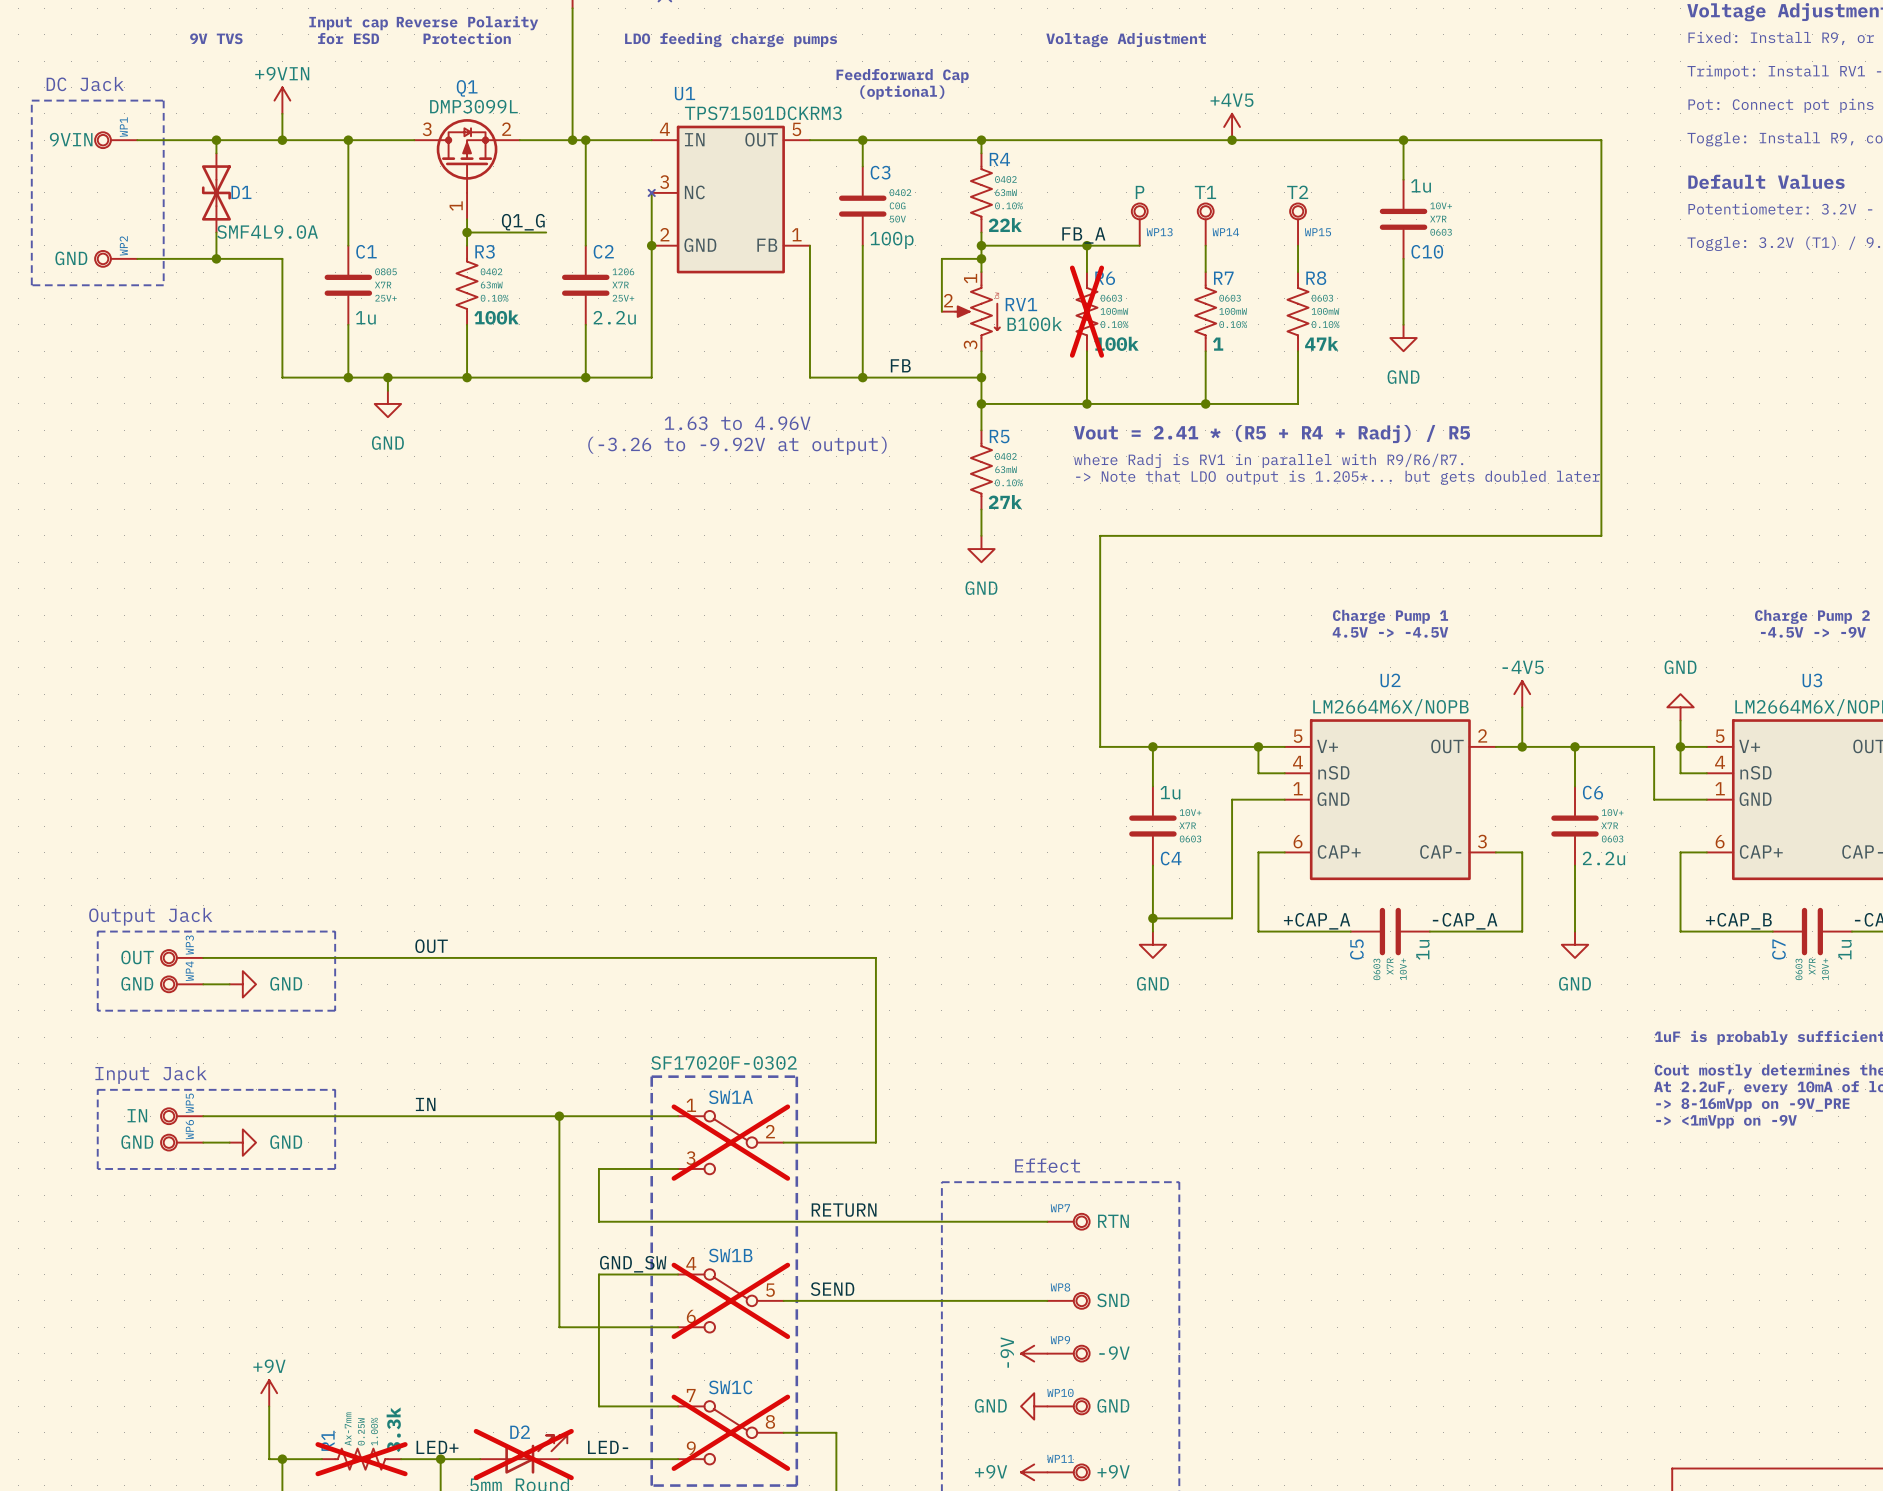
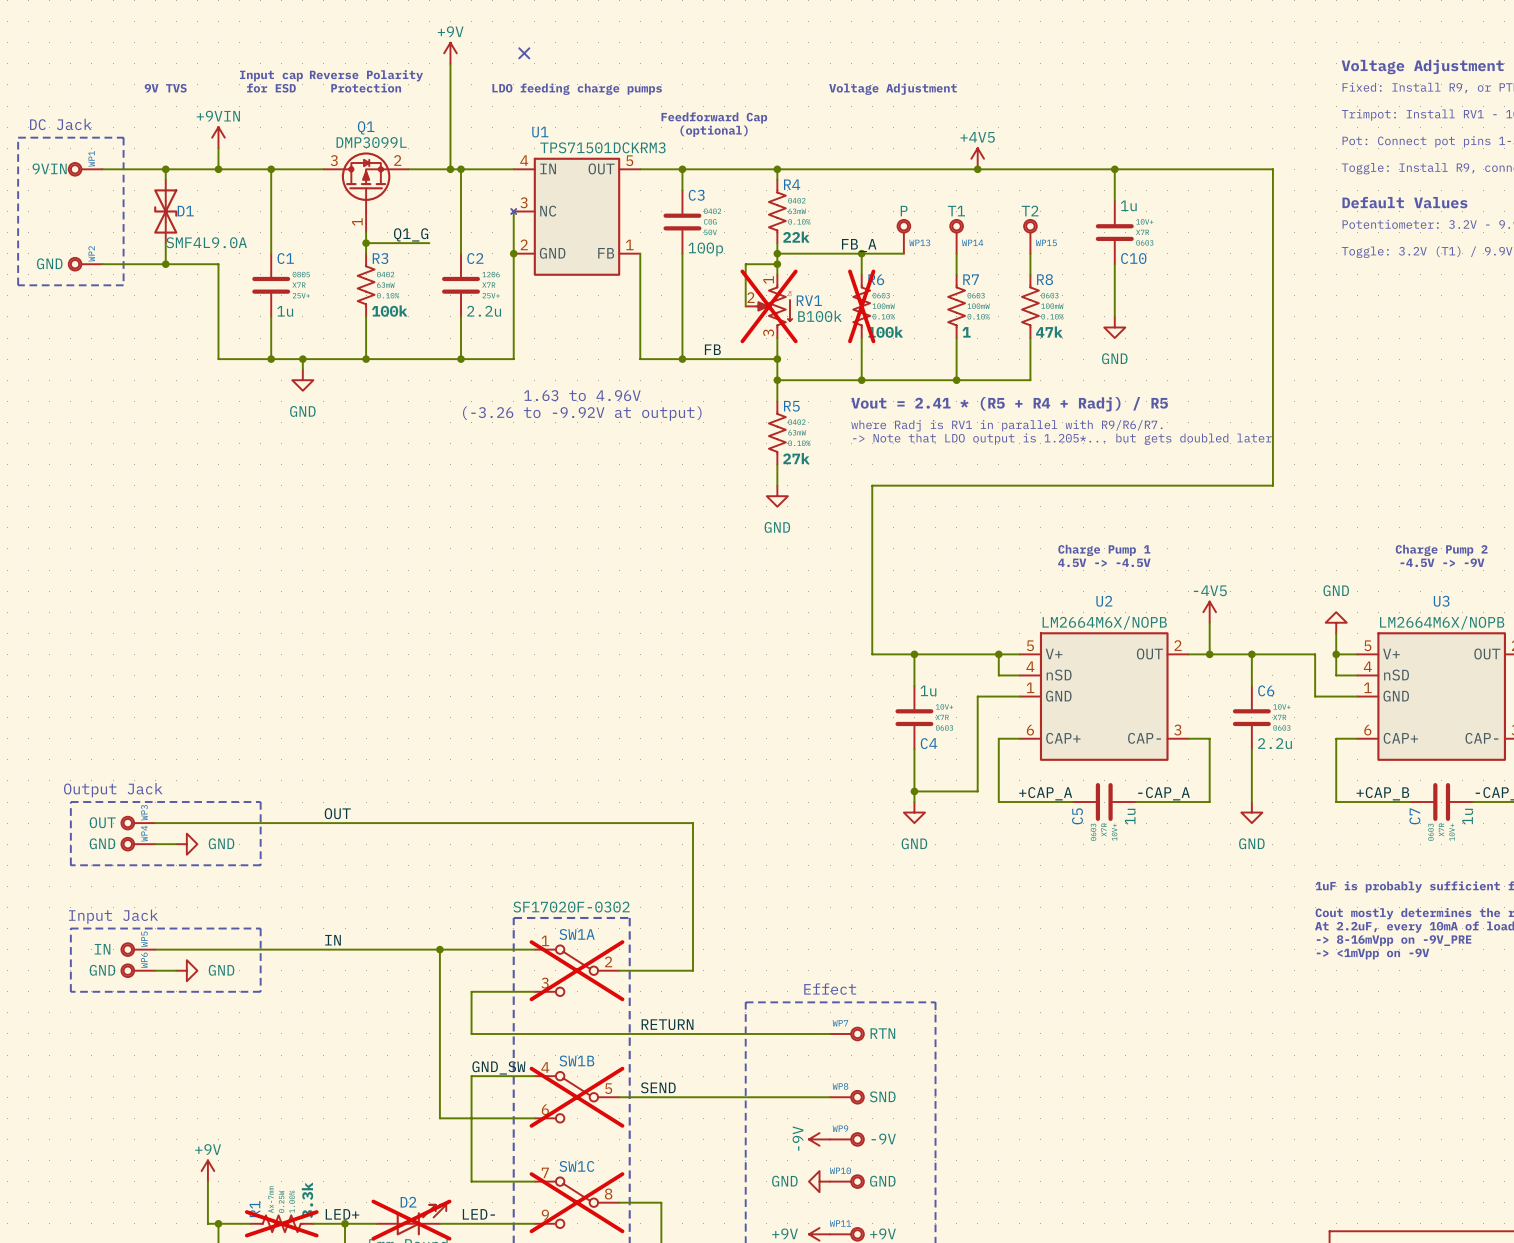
RV1 do-not-place cross: none -> (769, 306)

